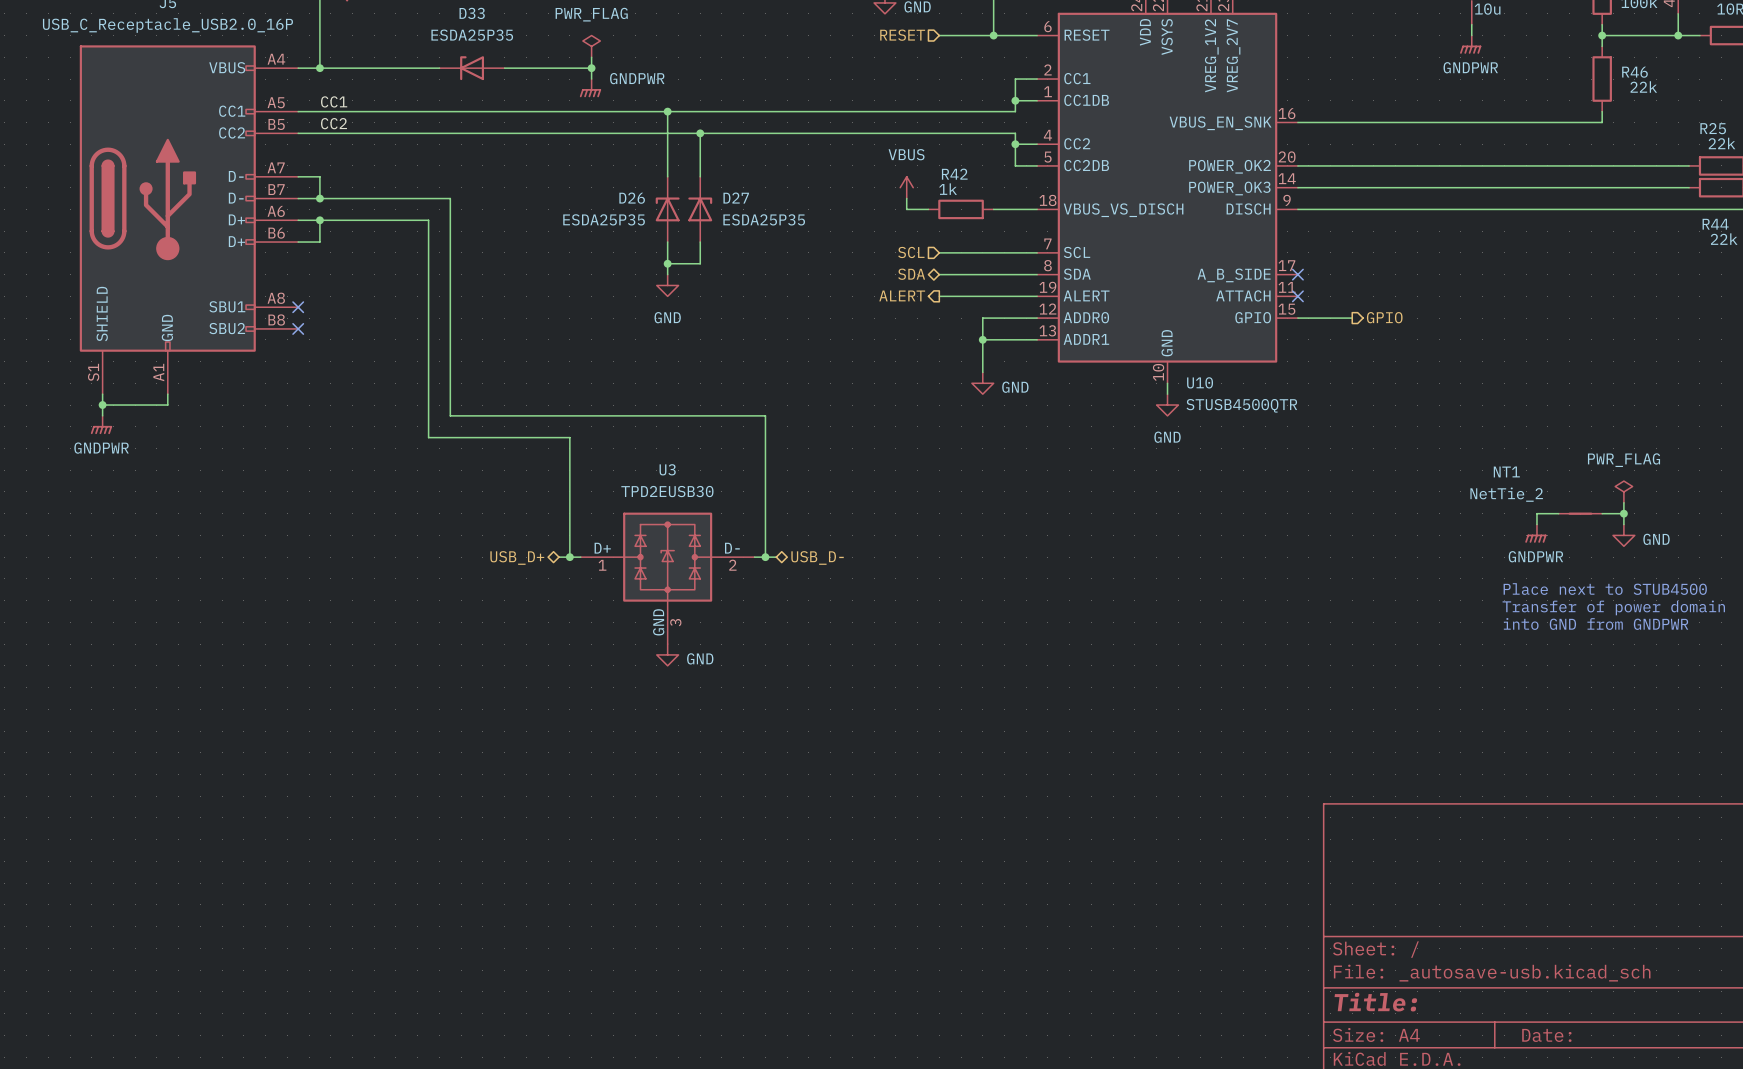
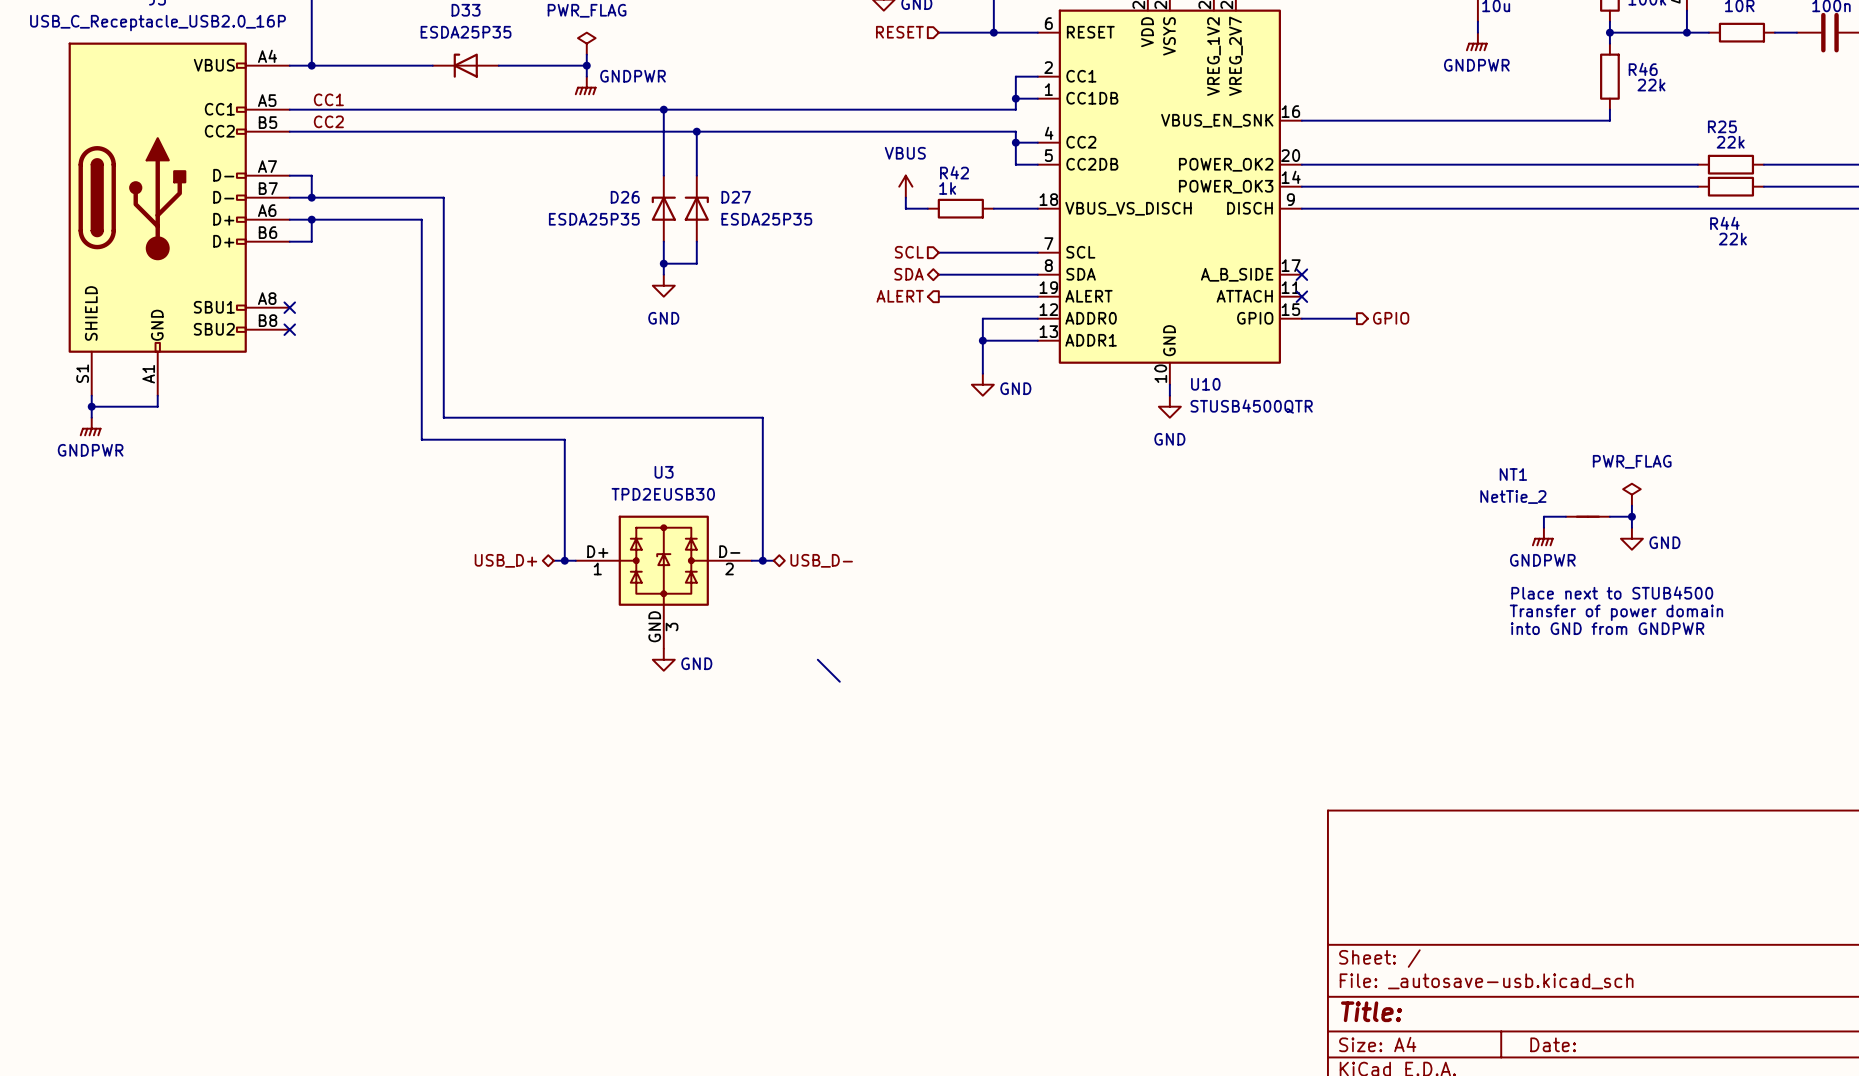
wire: none -> (817, 659) (839, 681)

